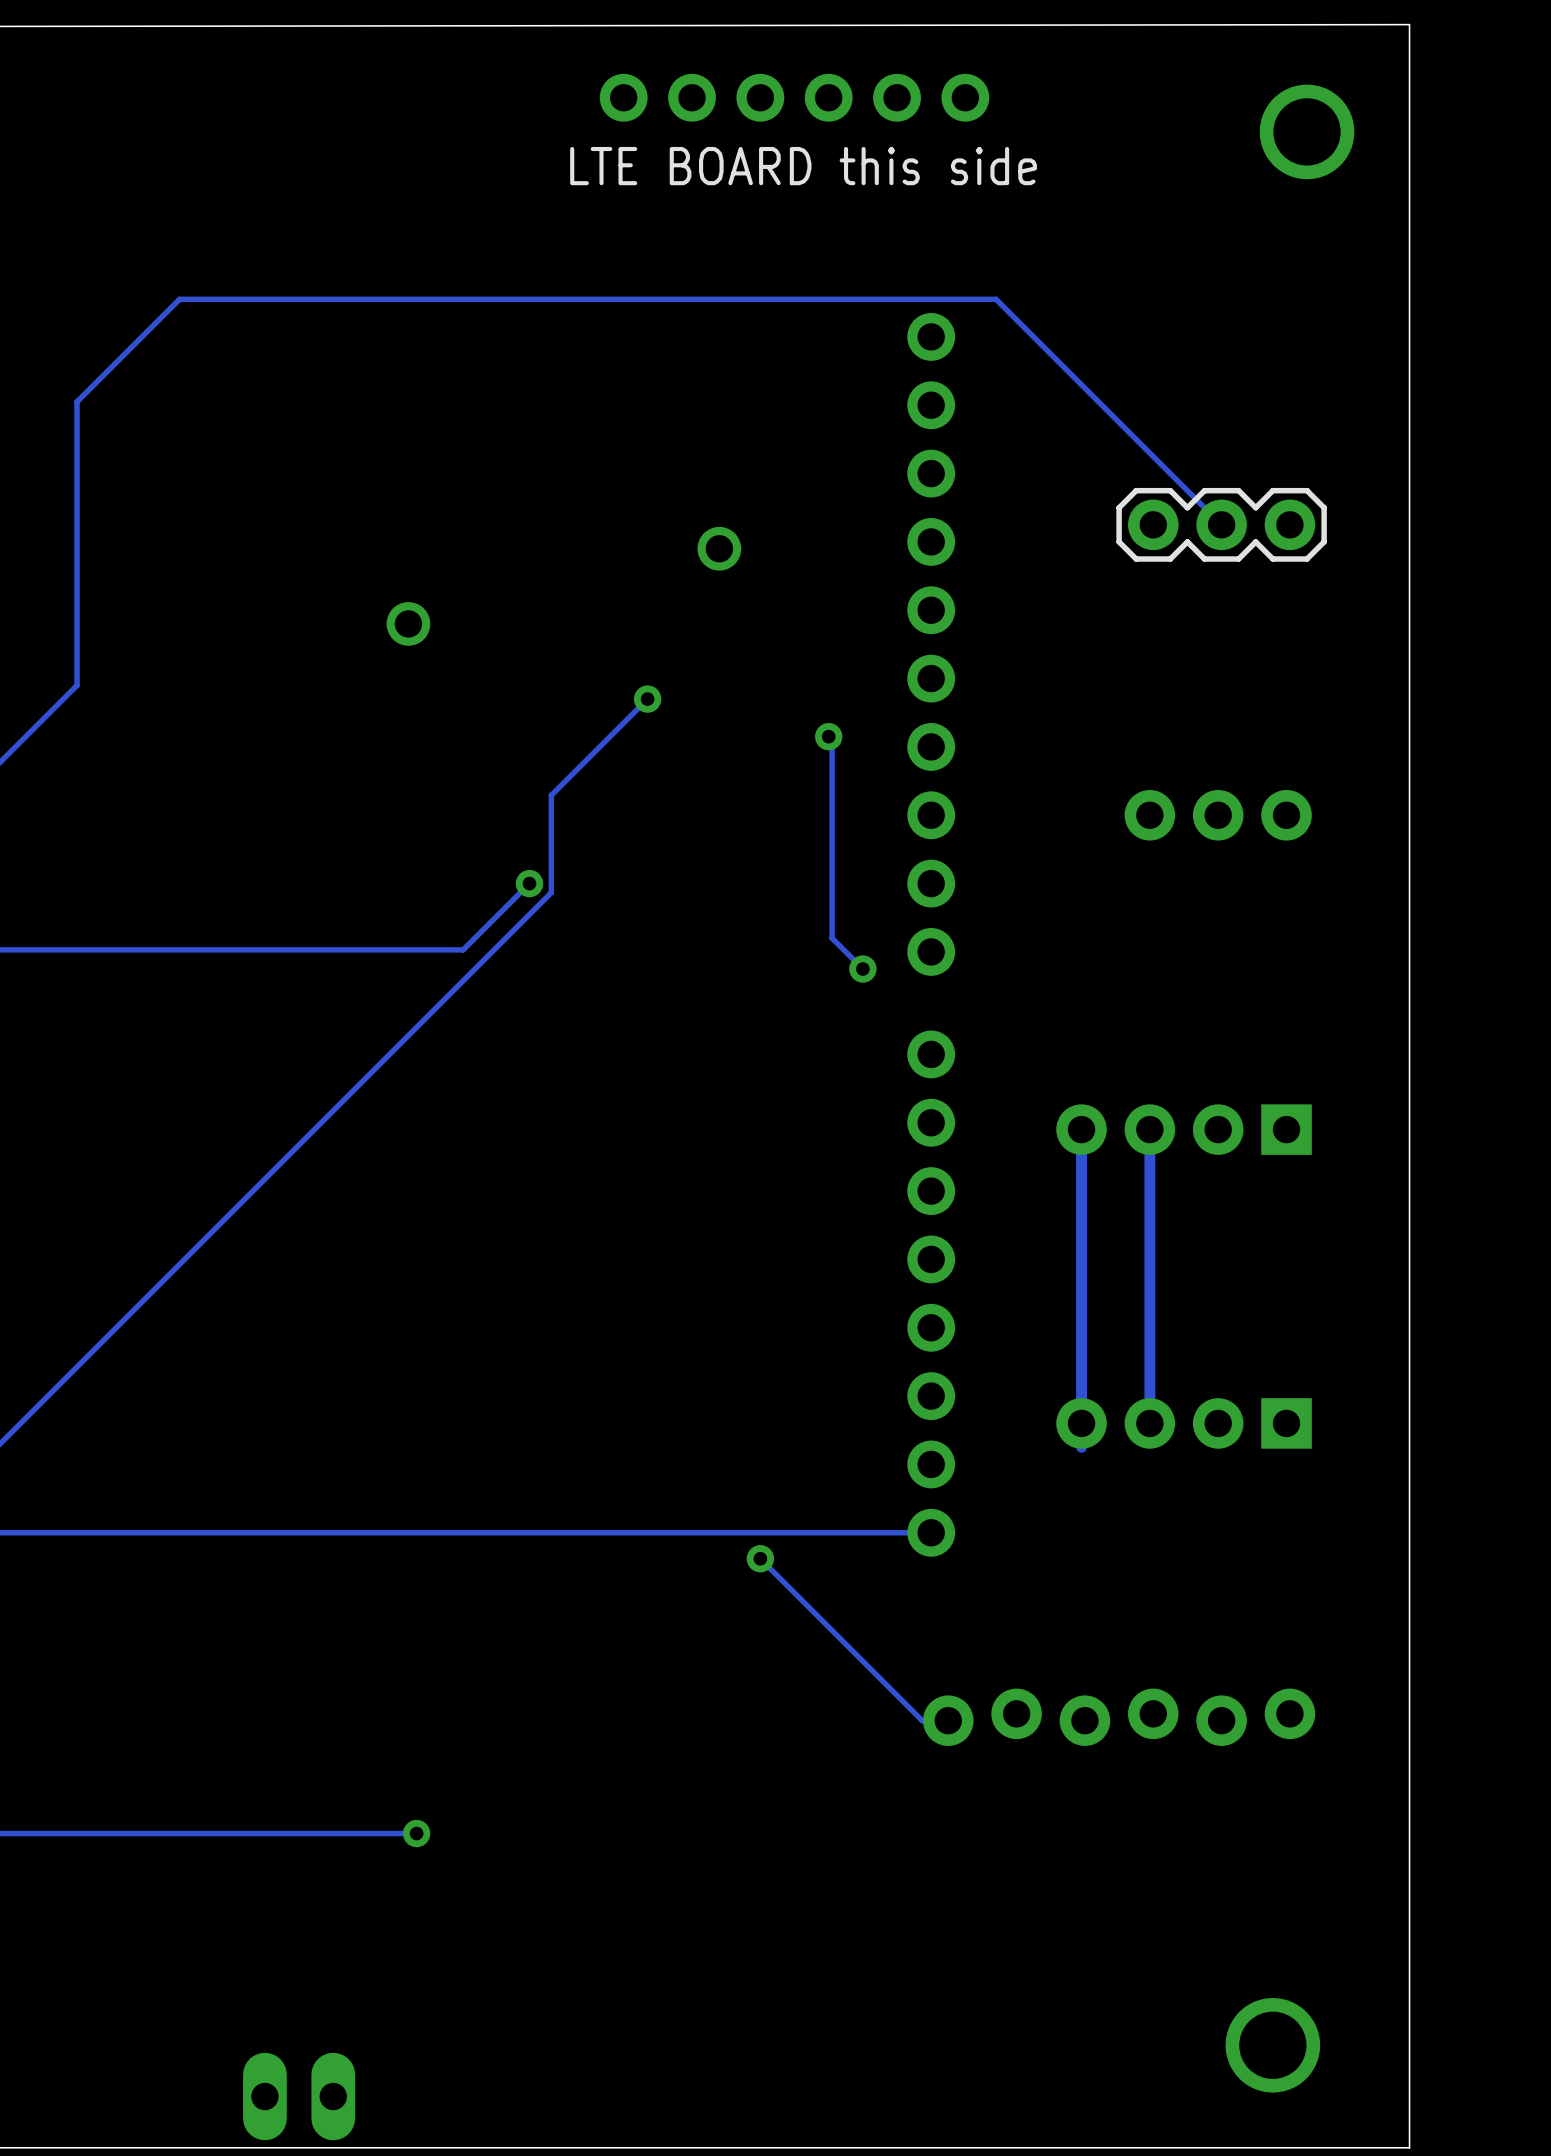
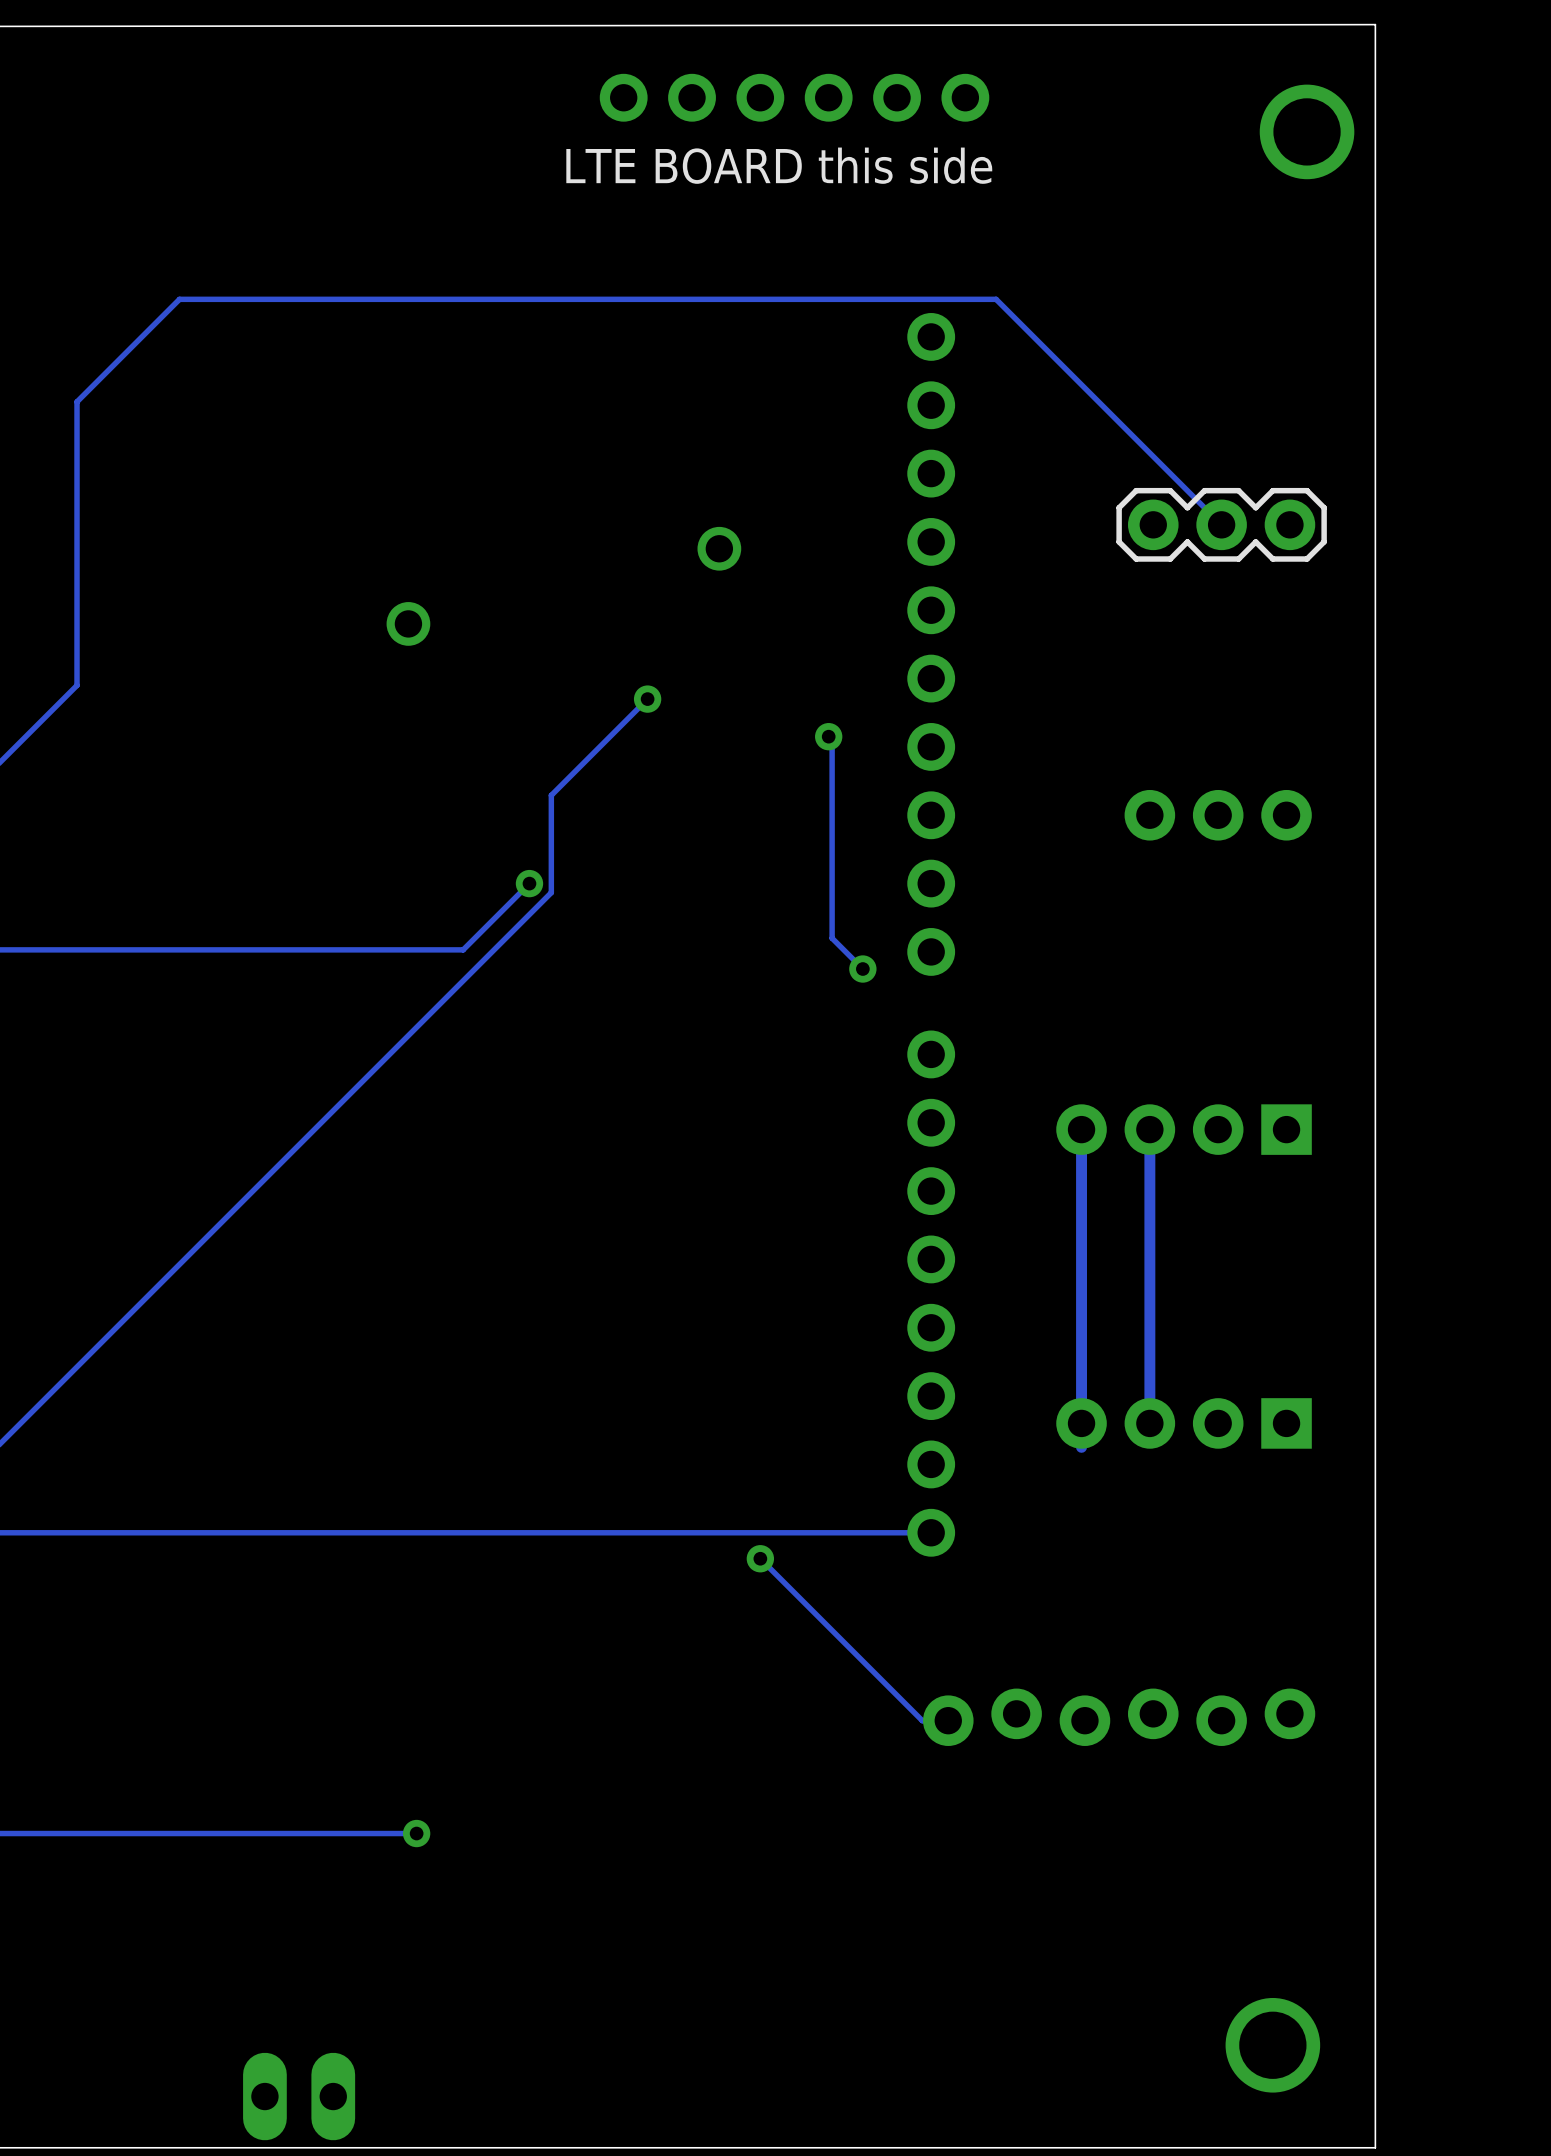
board edge: (1375, 24) (1409, 24) (1409, 2147) (1375, 2147) -> (1375, 24) (1375, 2147)

